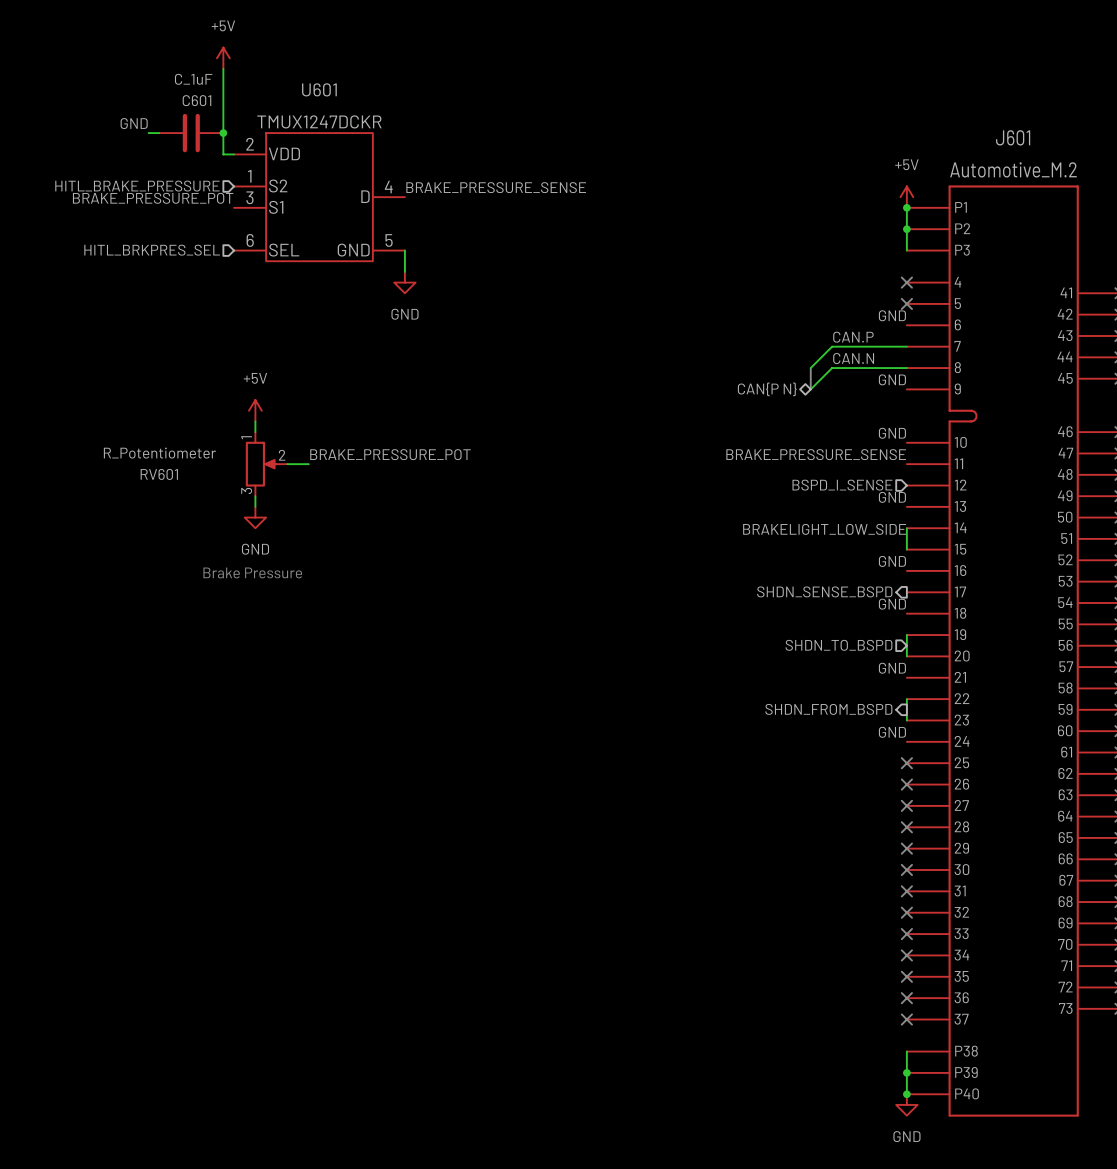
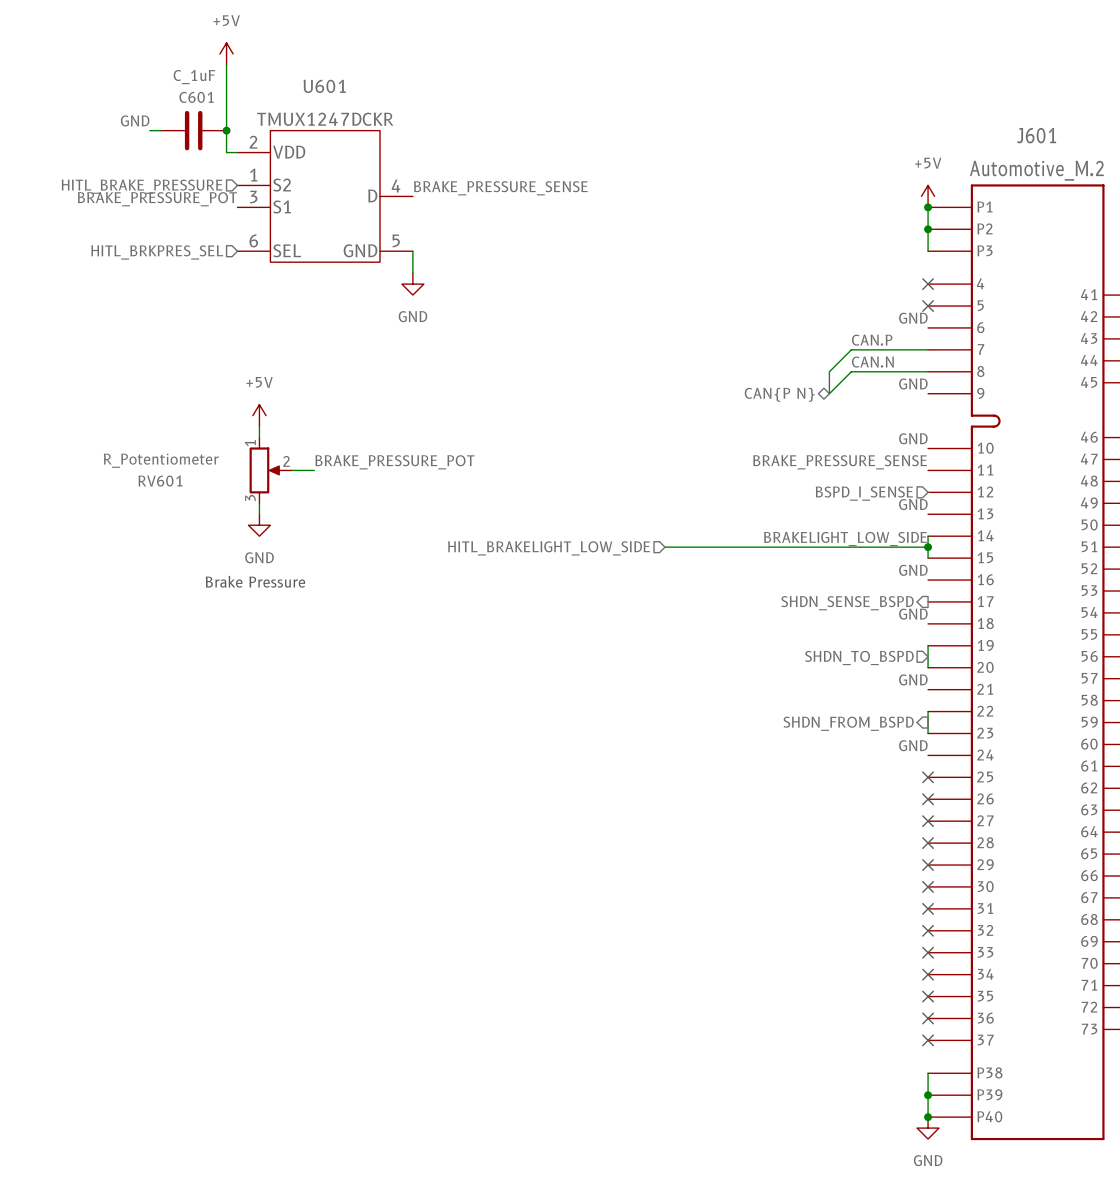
hierarchical label: none -> HITL_BRAKELIGHT_LOW_SIDE (549, 548)
wire: none -> (664, 547) (928, 547)
junction: none -> (928, 547)

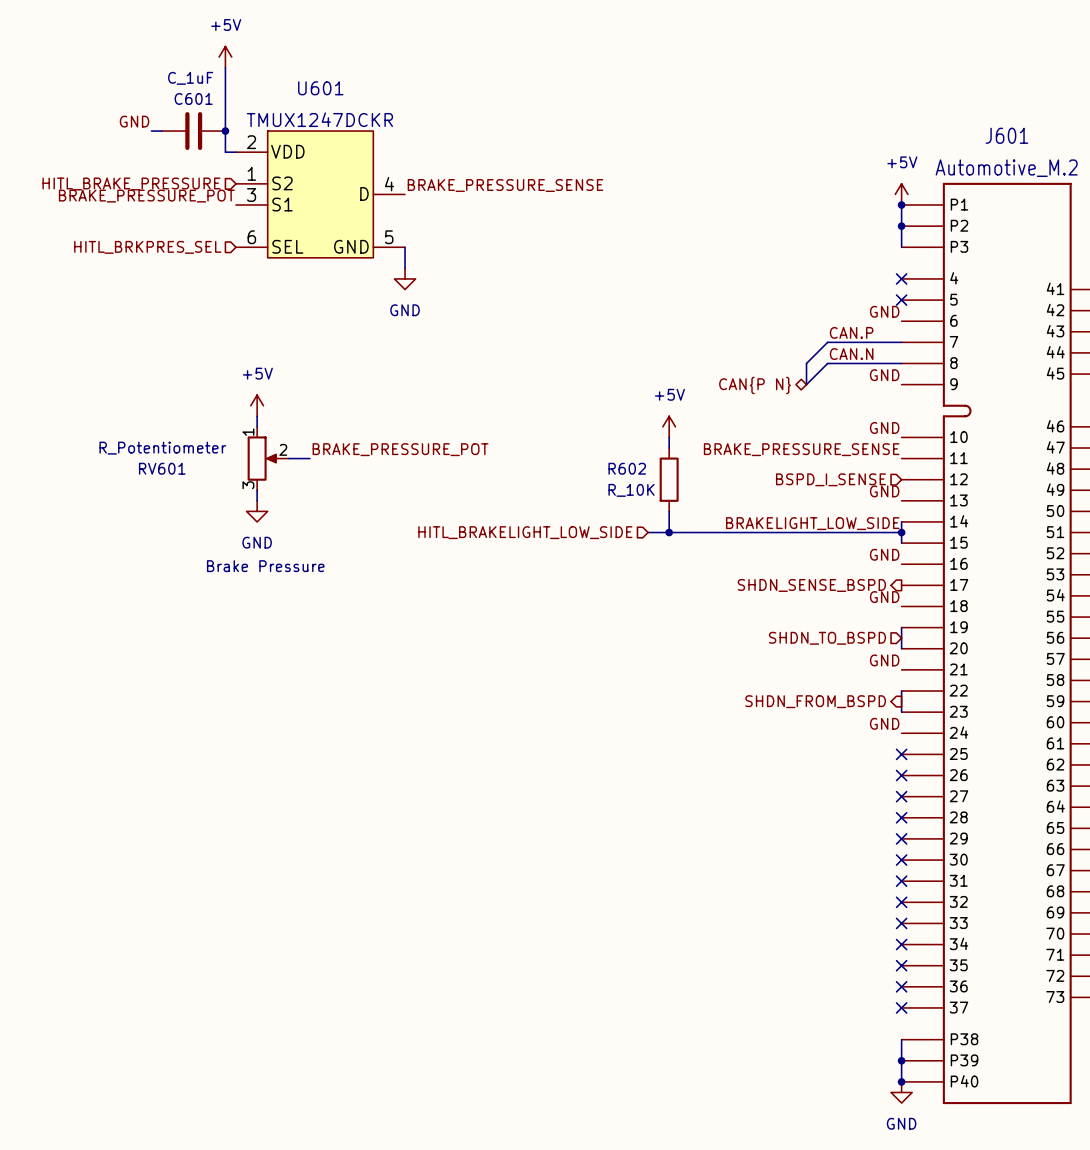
power symbol: none -> +5V (669, 426)
wire: none -> (669, 437) (669, 448)
R602: none -> R_10K (669, 479)
wire: none -> (669, 511) (669, 532)
junction: none -> (669, 532)

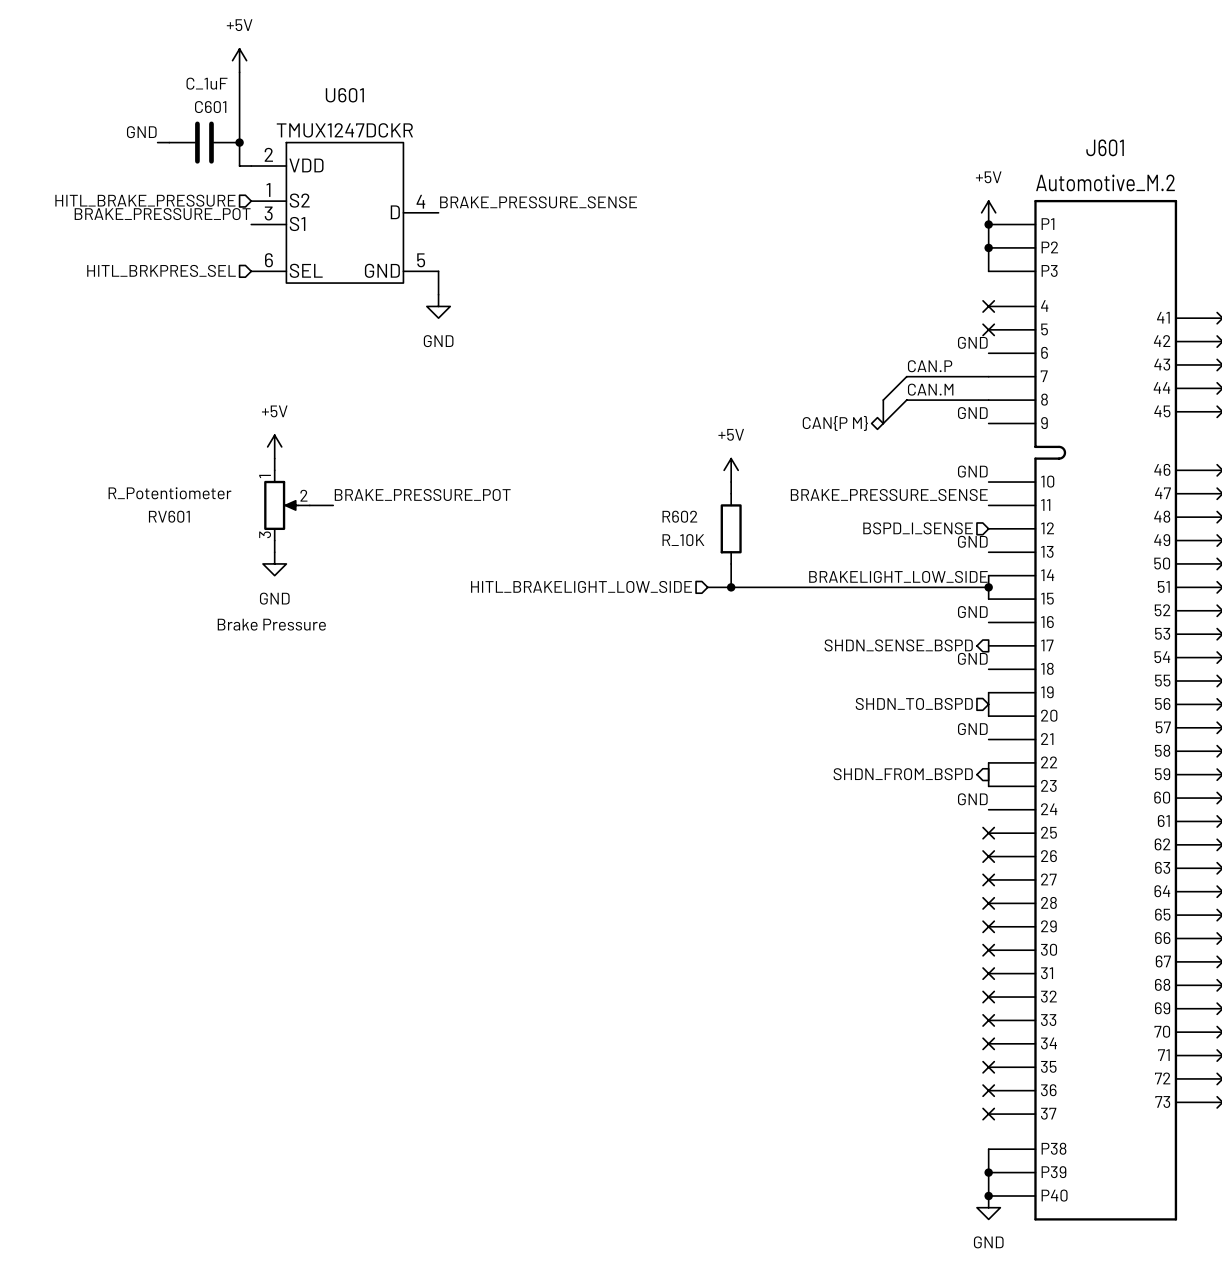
label: CAN.N (851, 354) -> CAN.M (930, 389)
hierarchical label: CAN{P N} (755, 385) -> CAN{P M} (835, 423)

